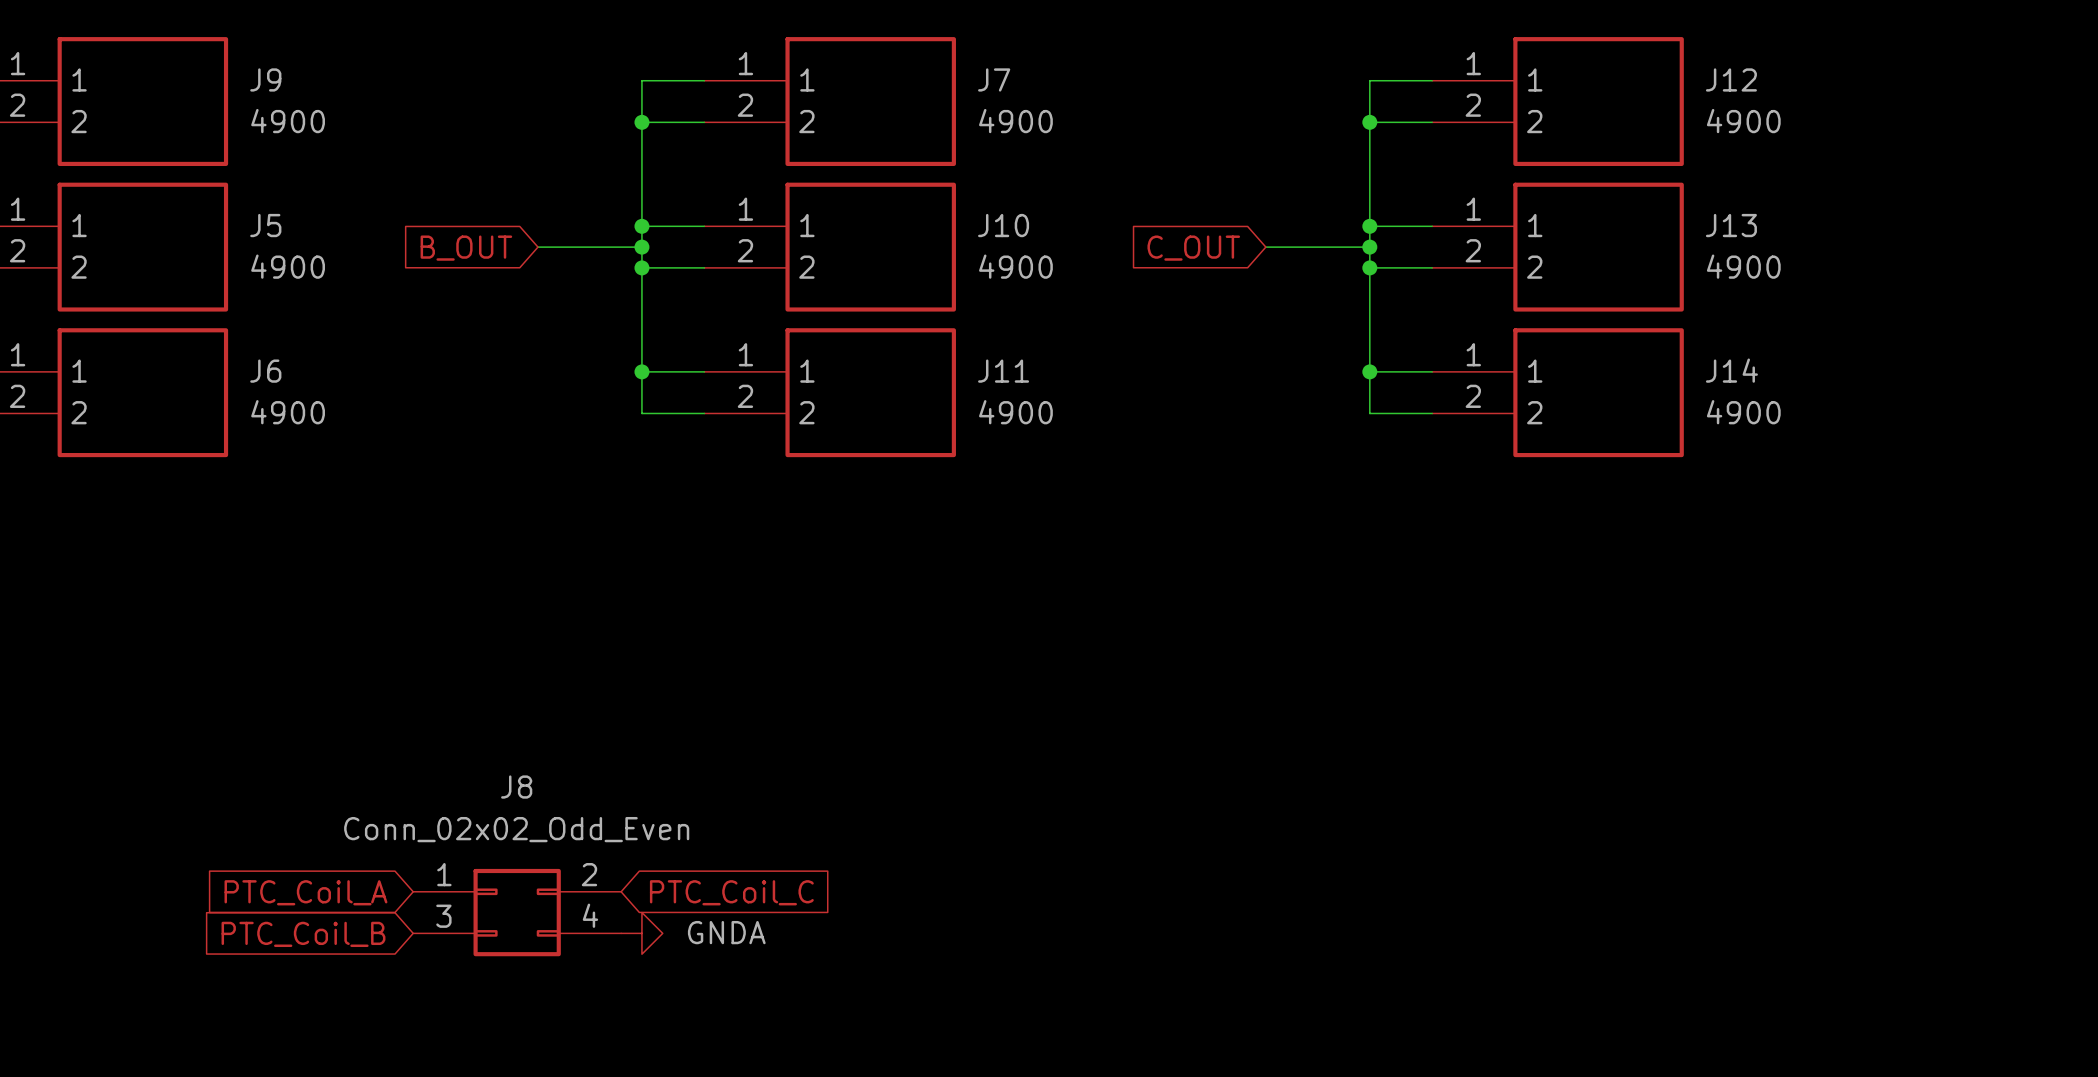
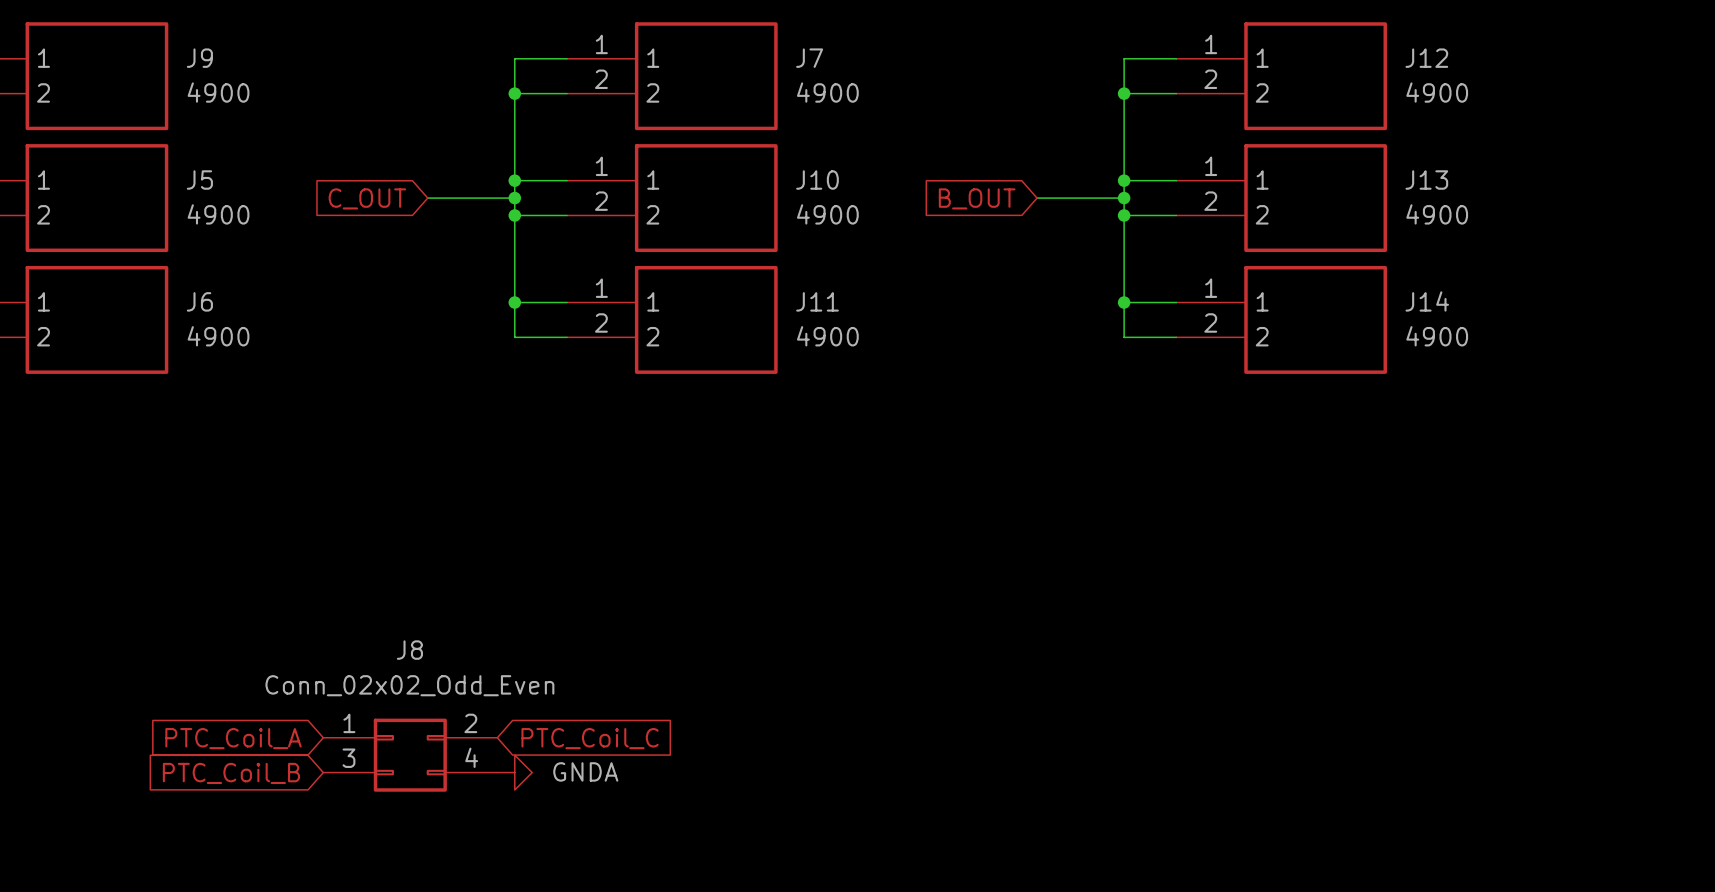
global label: B_OUT (466, 248) -> C_OUT (367, 198)
global label: C_OUT (1193, 248) -> B_OUT (977, 198)

